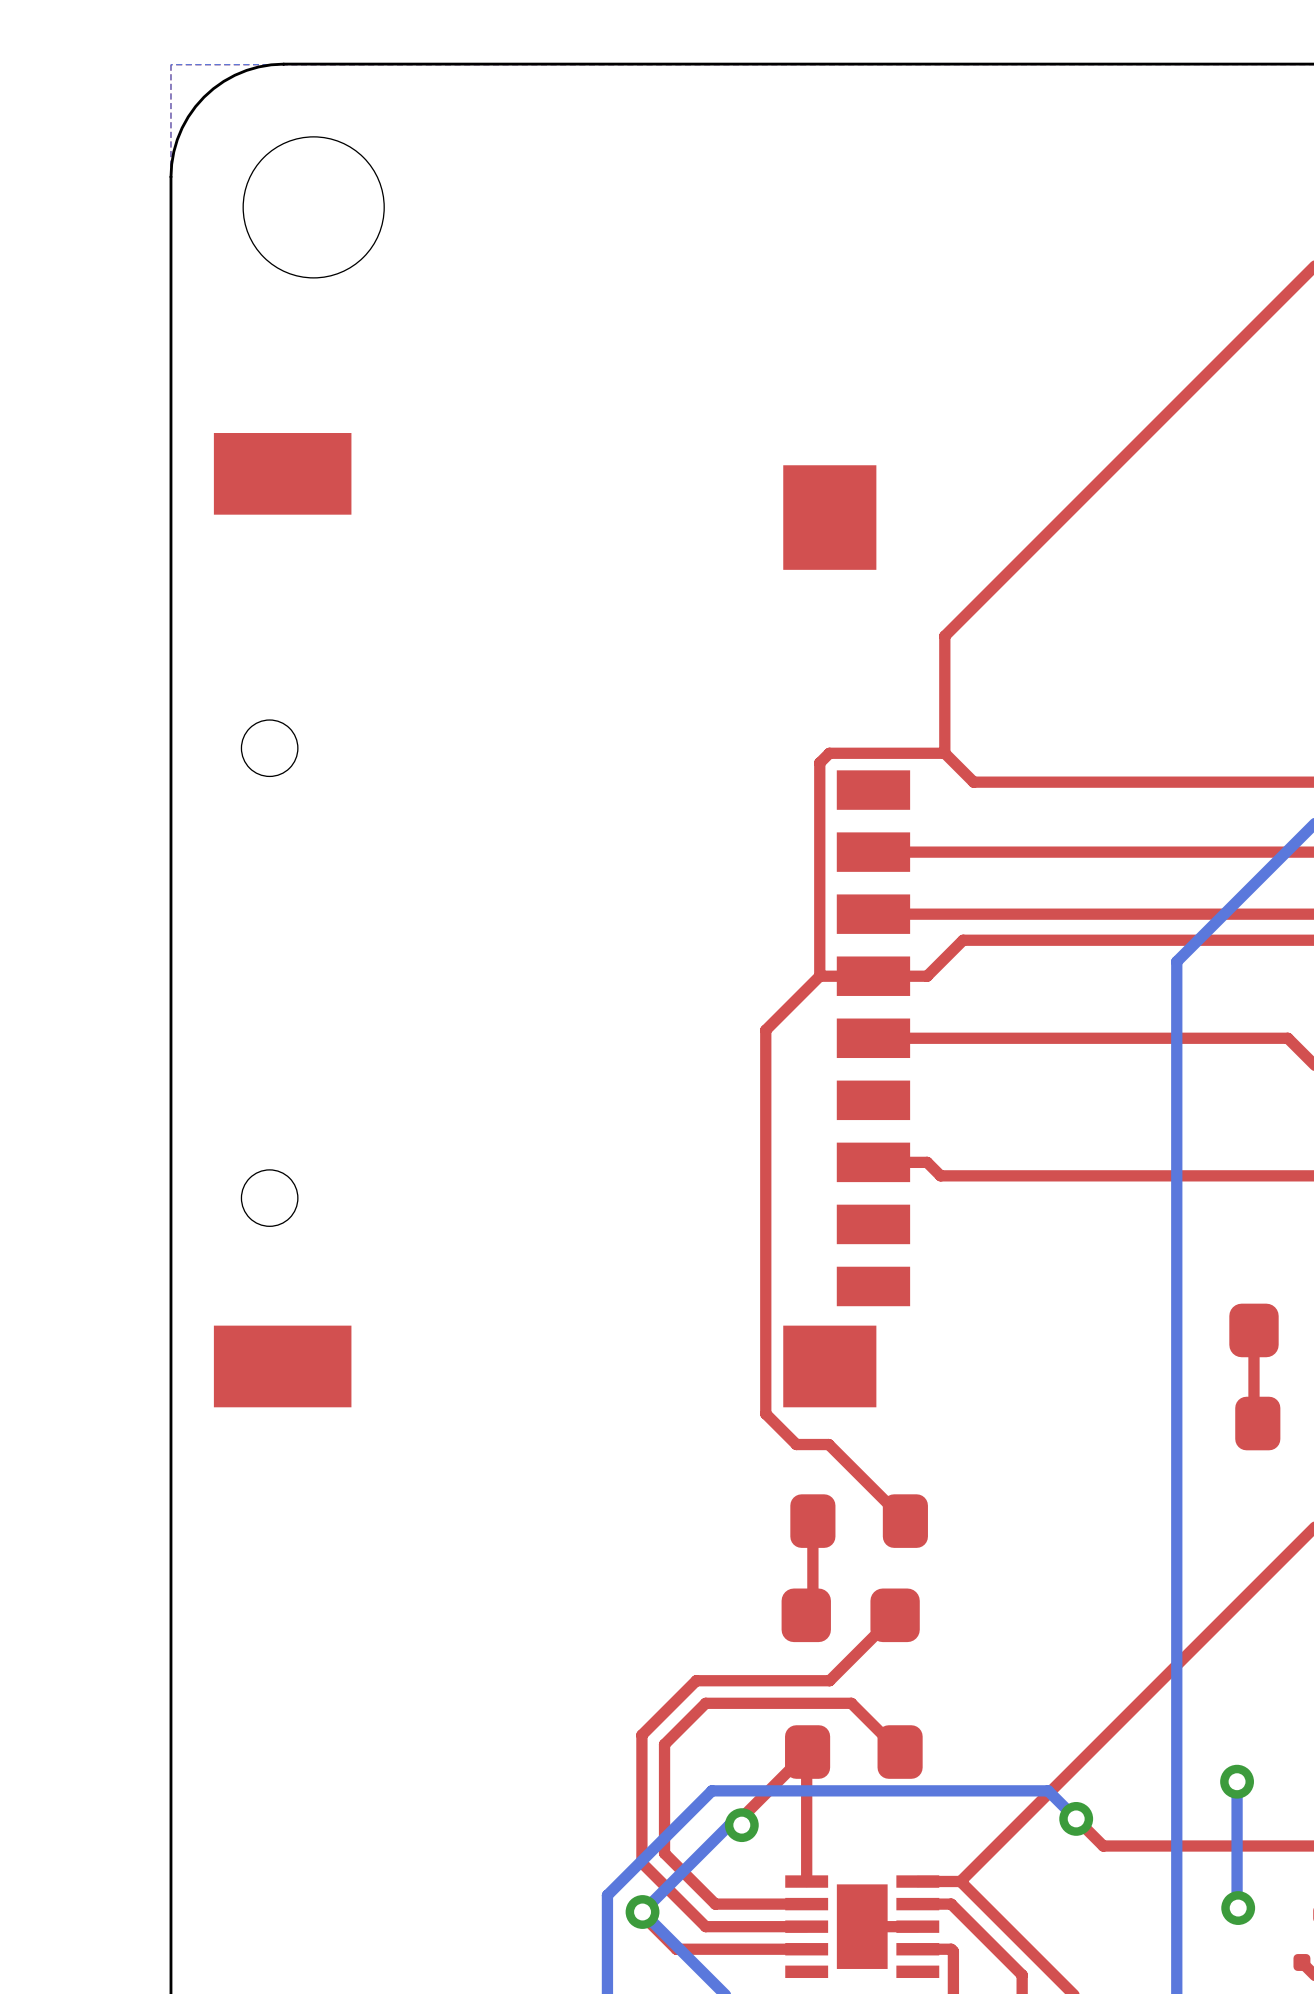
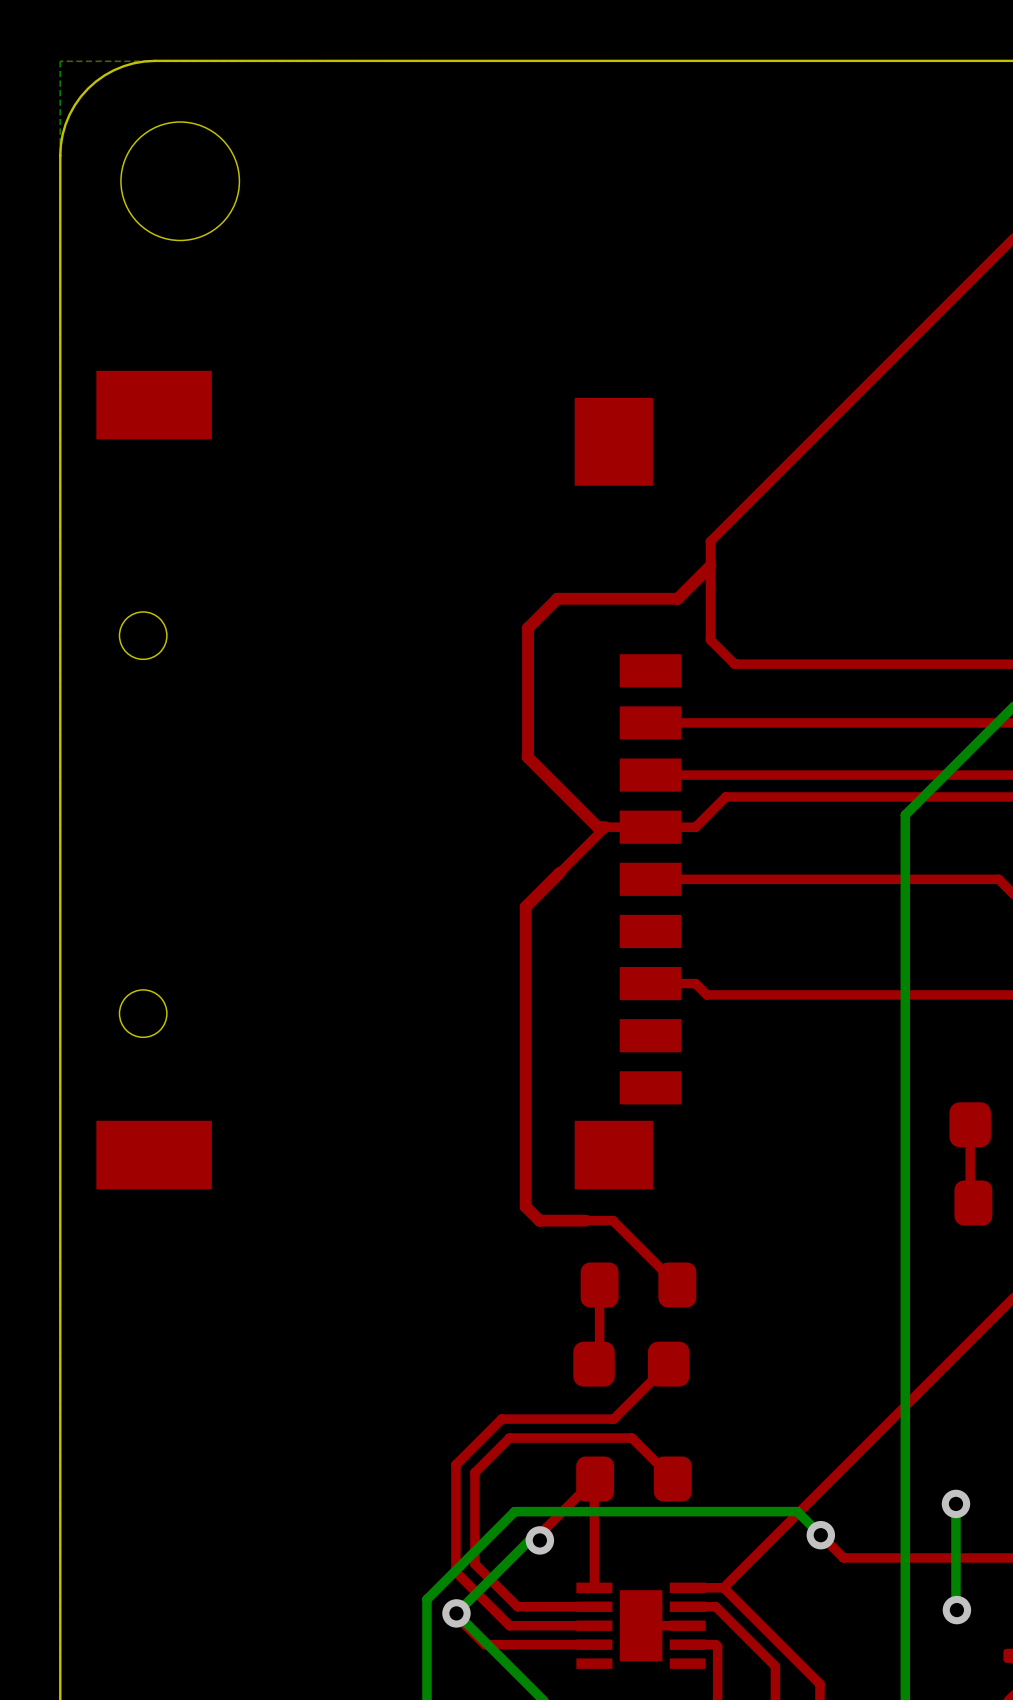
top track: (944, 753) (829, 753) (819, 762) (819, 976) -> (710, 566) (677, 598) (557, 598) (528, 628) (528, 757) (597, 827) (605, 827)
top track: (765, 1030) (765, 1413) (796, 1444) -> (560, 872) (525, 906) (525, 1206) (539, 1220) (585, 1220)

